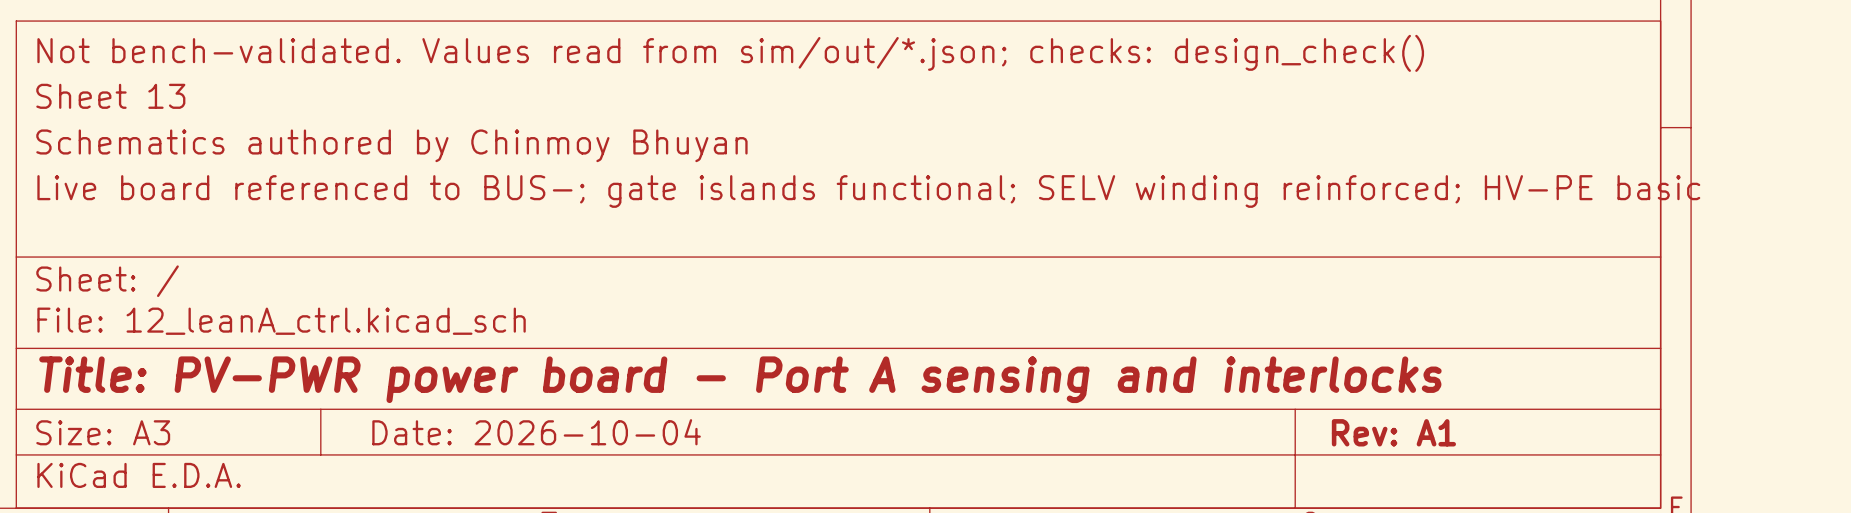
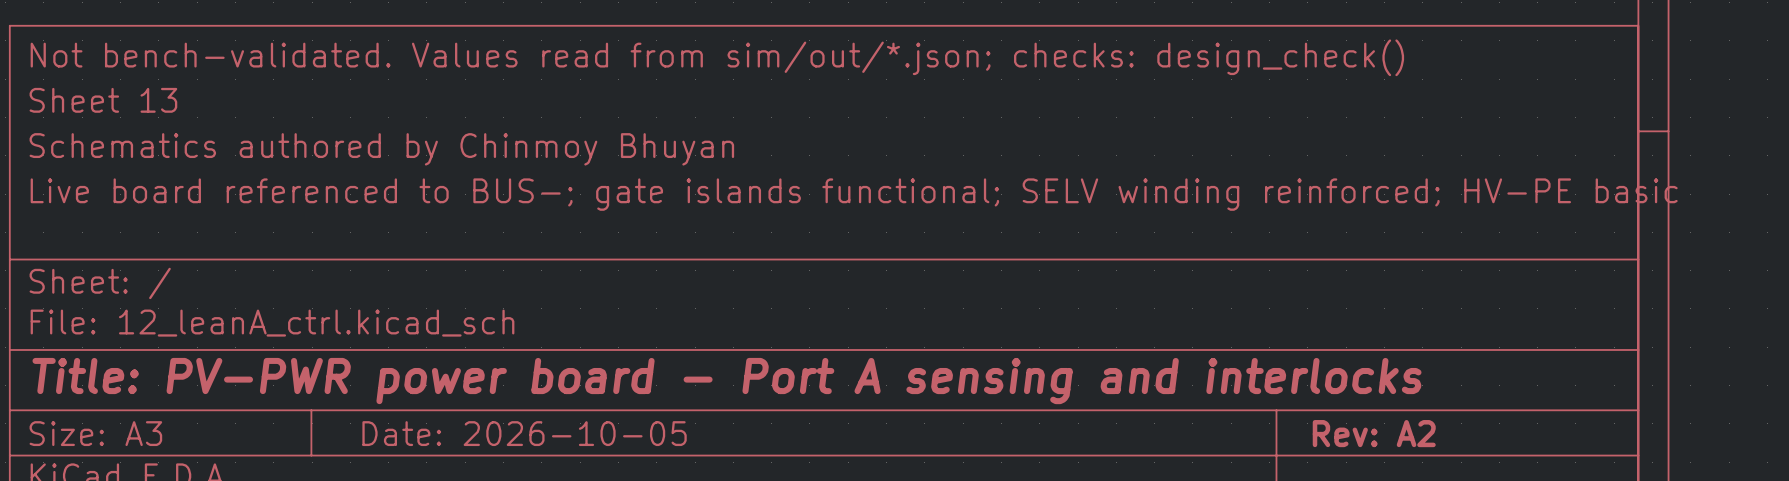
title block: Date: 2026-10-04 (536, 432) -> Date: 2026-10-05 (524, 433)
title block: Rev: A1 (1393, 432) -> Rev: A2 (1374, 433)

